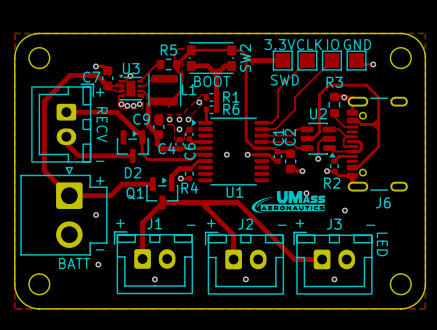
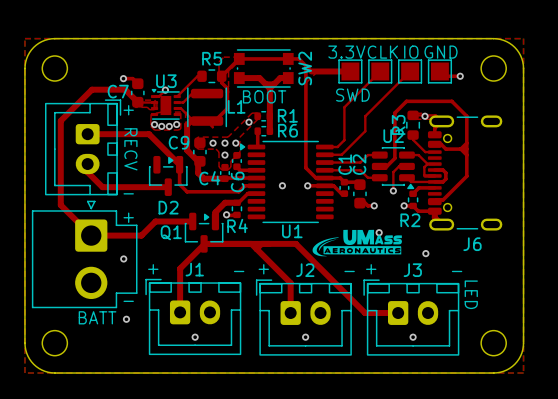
R3 name rotation: 0° (334, 82) -> 90° counterclockwise (398, 124)
R3 name position: R3 (334, 82) -> R3 (398, 124)

